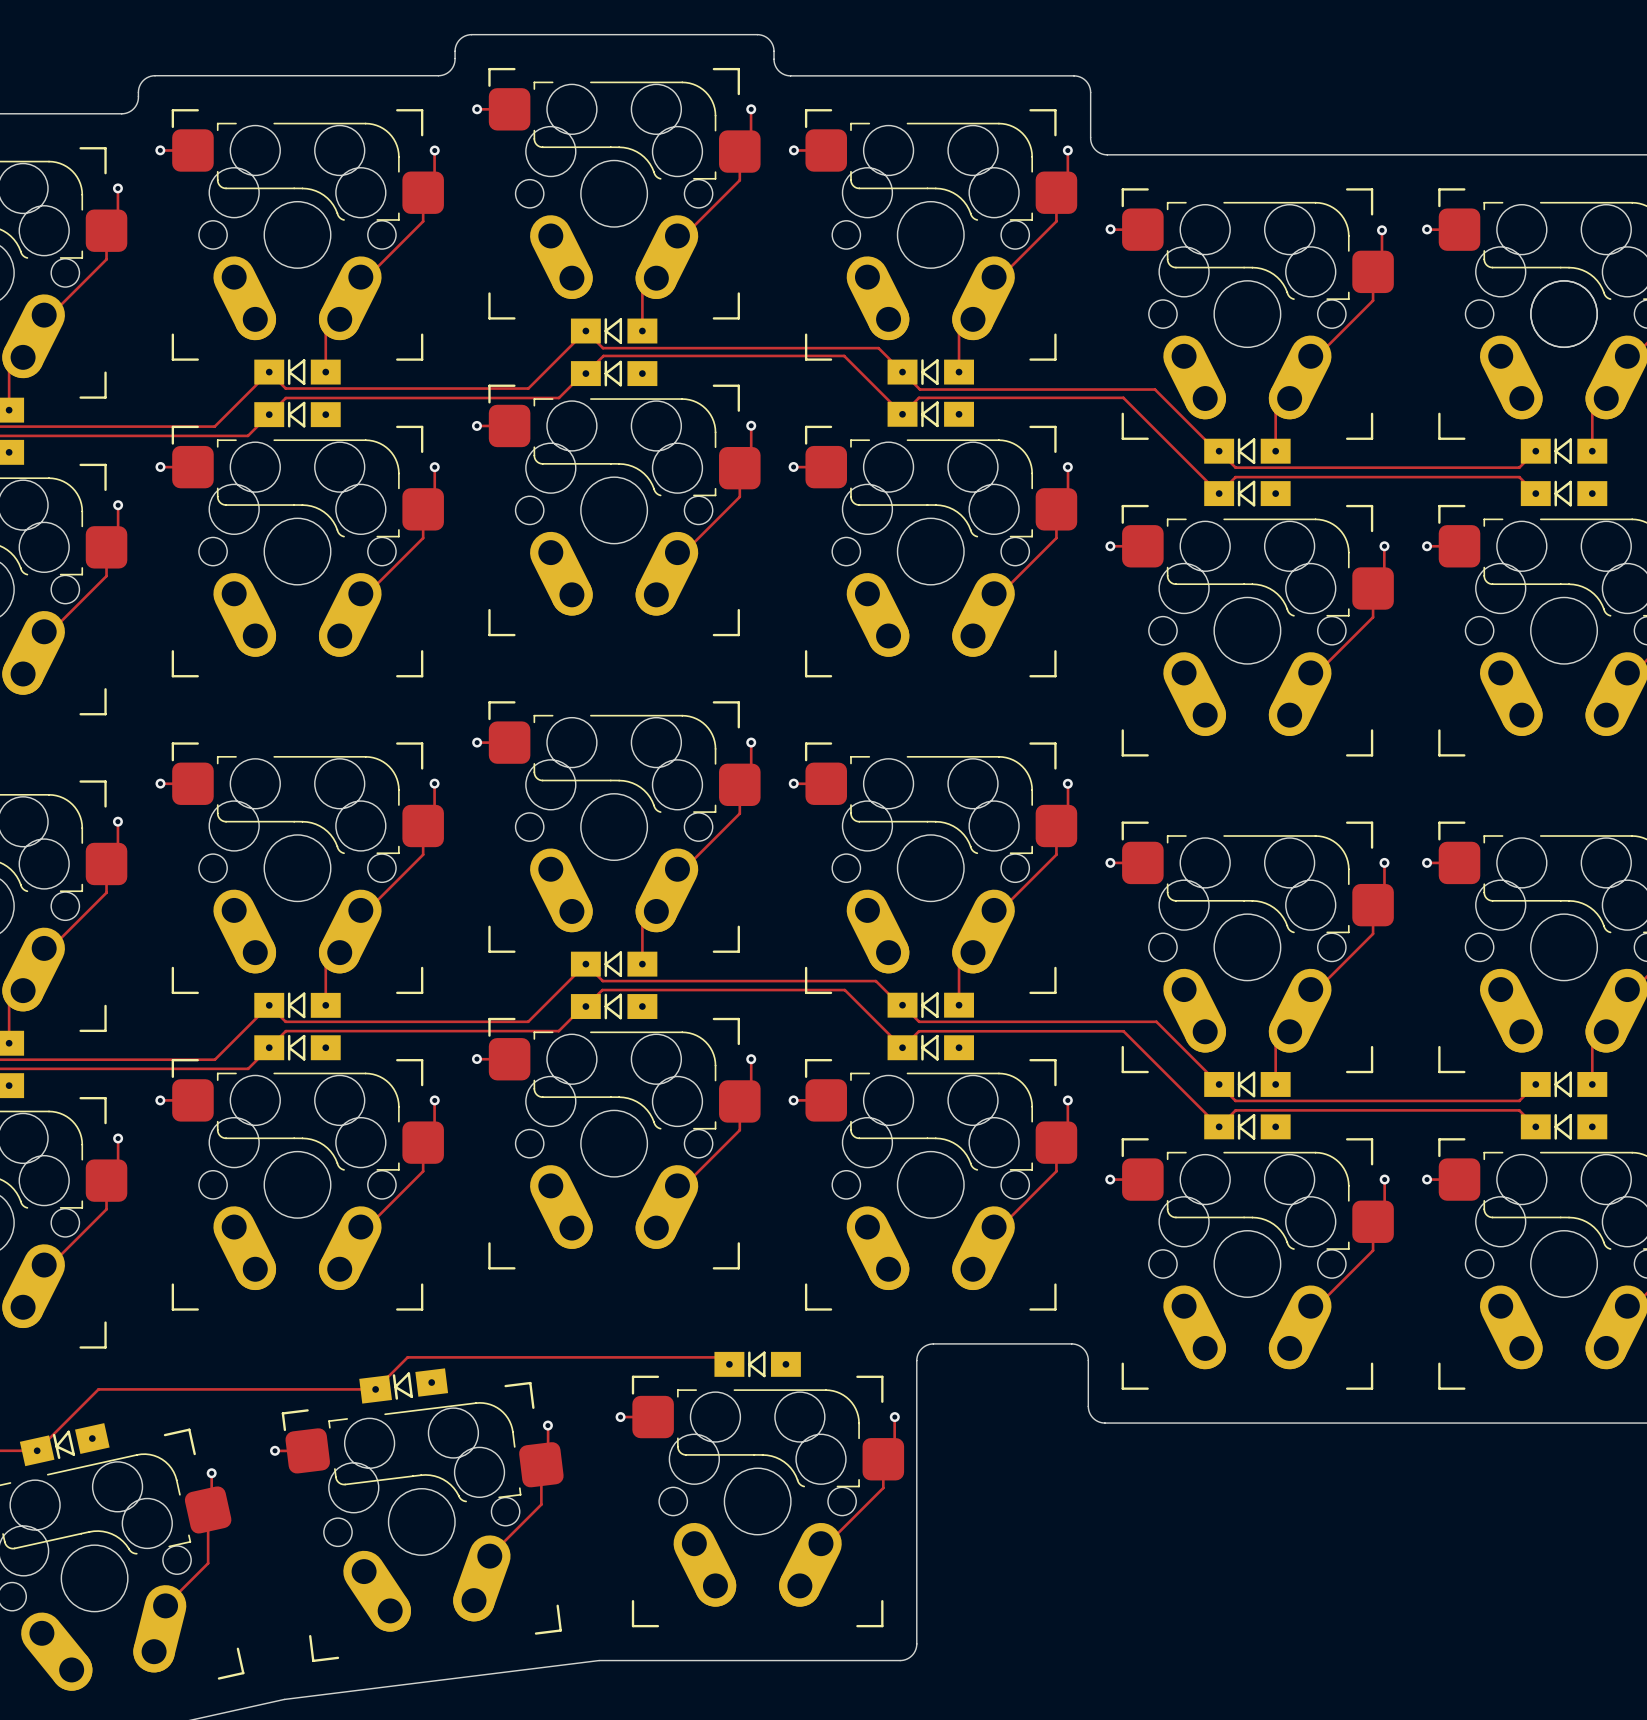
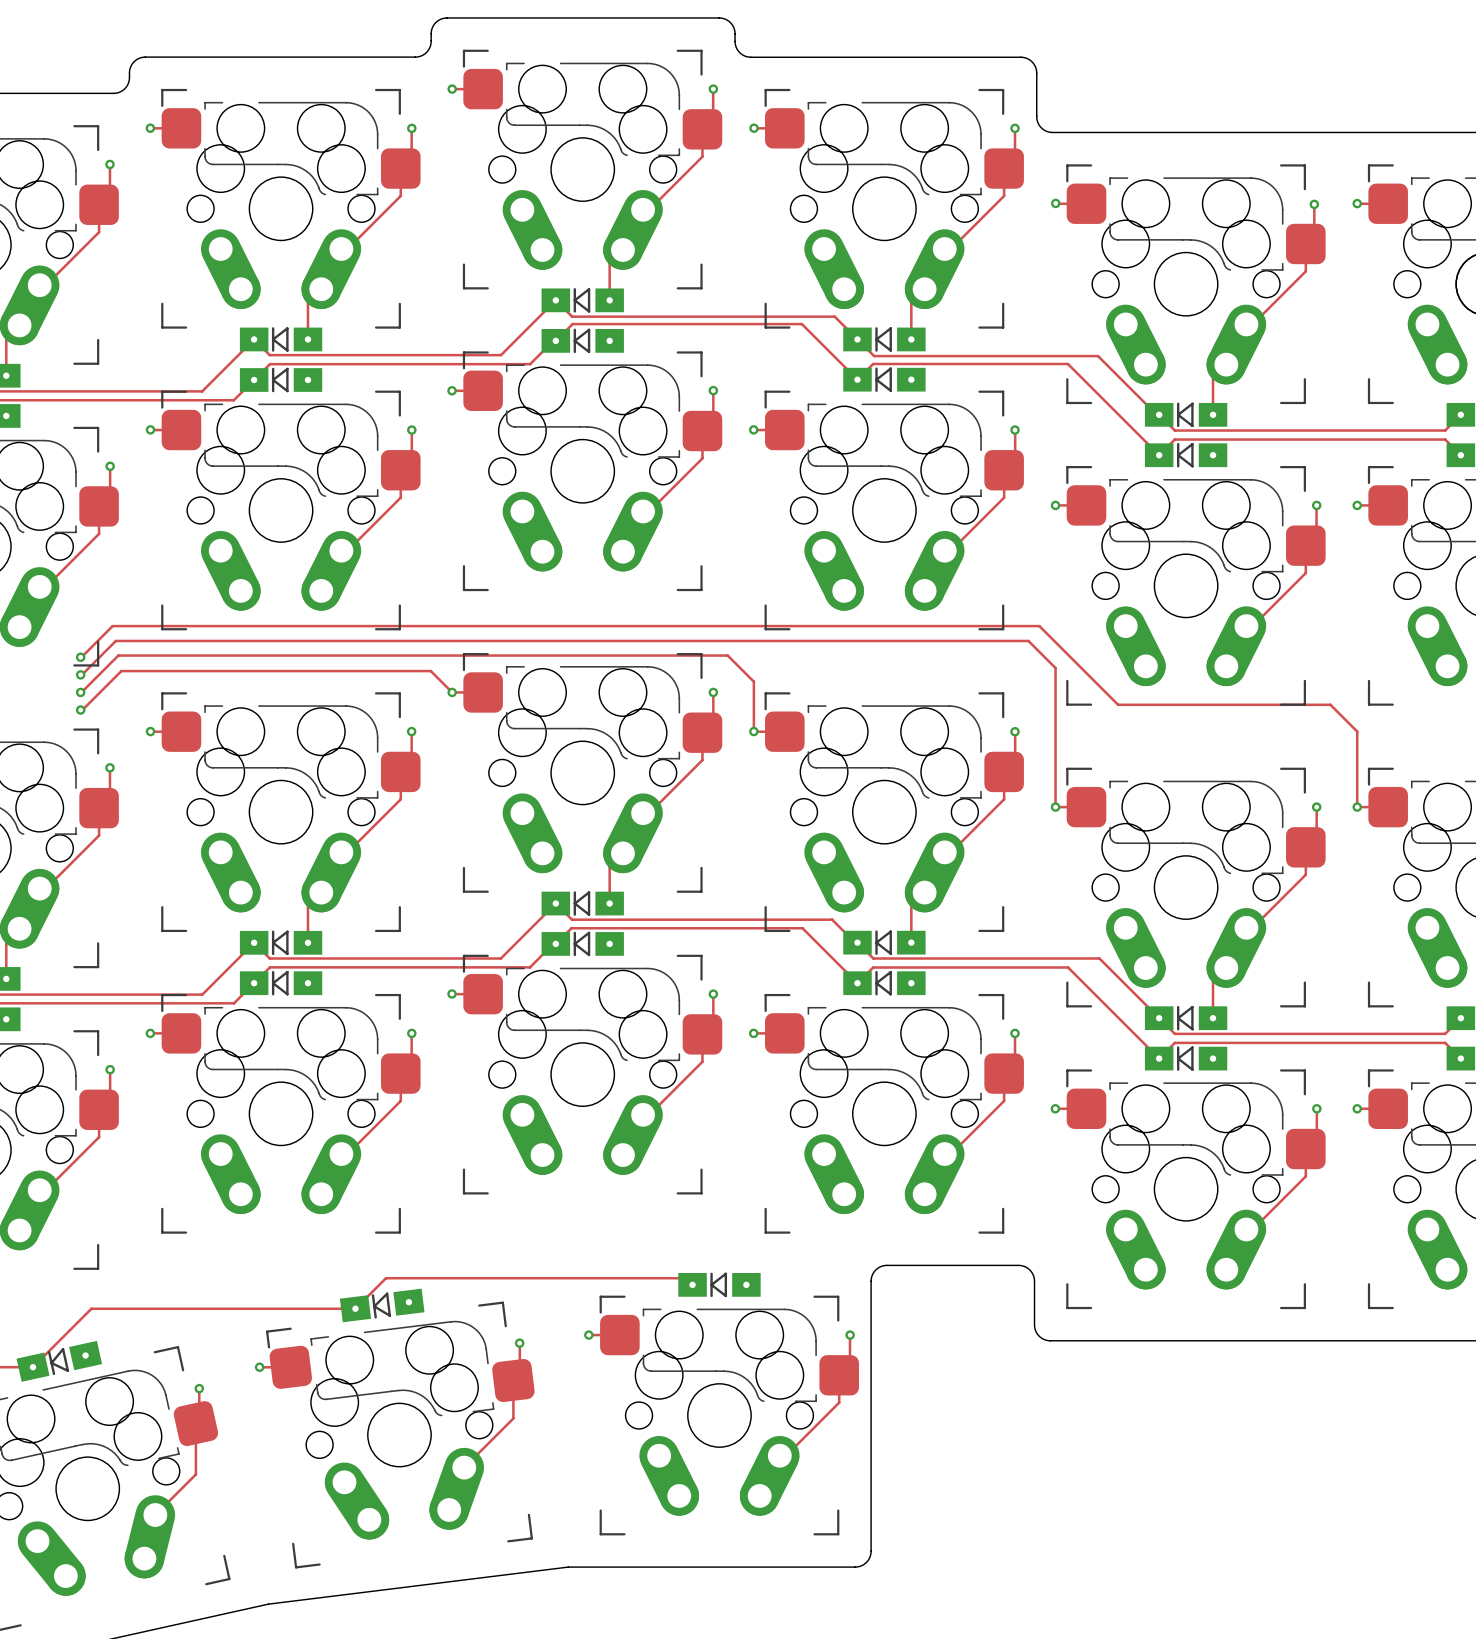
via: none -> (80, 657)
track: none -> (81, 657) (112, 626) (1039, 626) (1118, 704) (1330, 704) (1357, 731) (1357, 807)
track: none -> (82, 674) (115, 640) (1028, 640) (1055, 668) (1055, 807)
via: none -> (80, 674)
via: none -> (80, 692)
track: none -> (452, 692) (430, 671) (121, 671) (80, 710)
track: none -> (80, 693) (118, 655) (727, 655) (753, 681) (753, 731)
via: none -> (80, 710)

